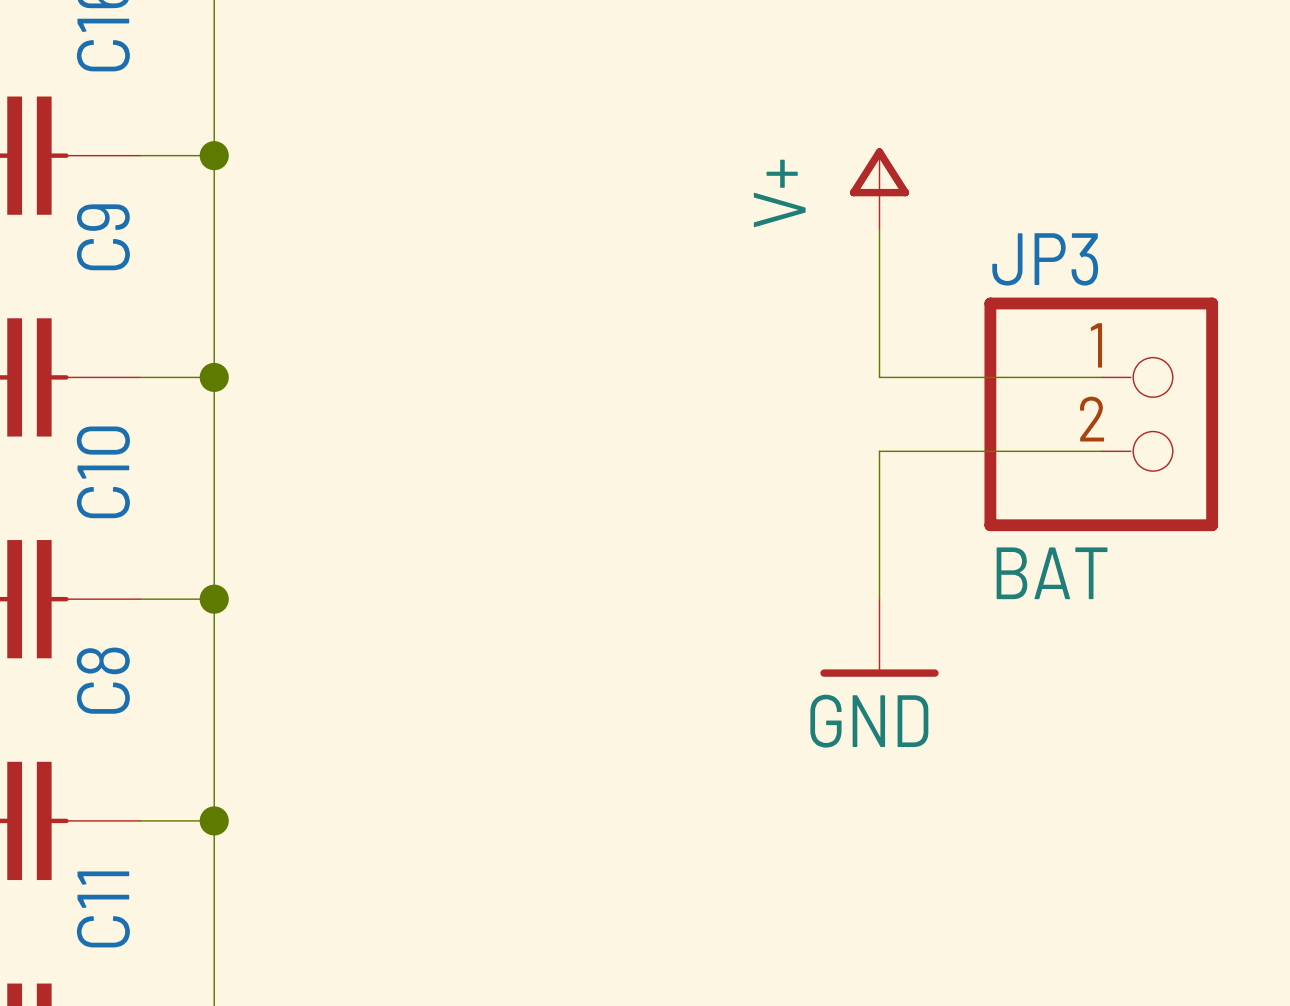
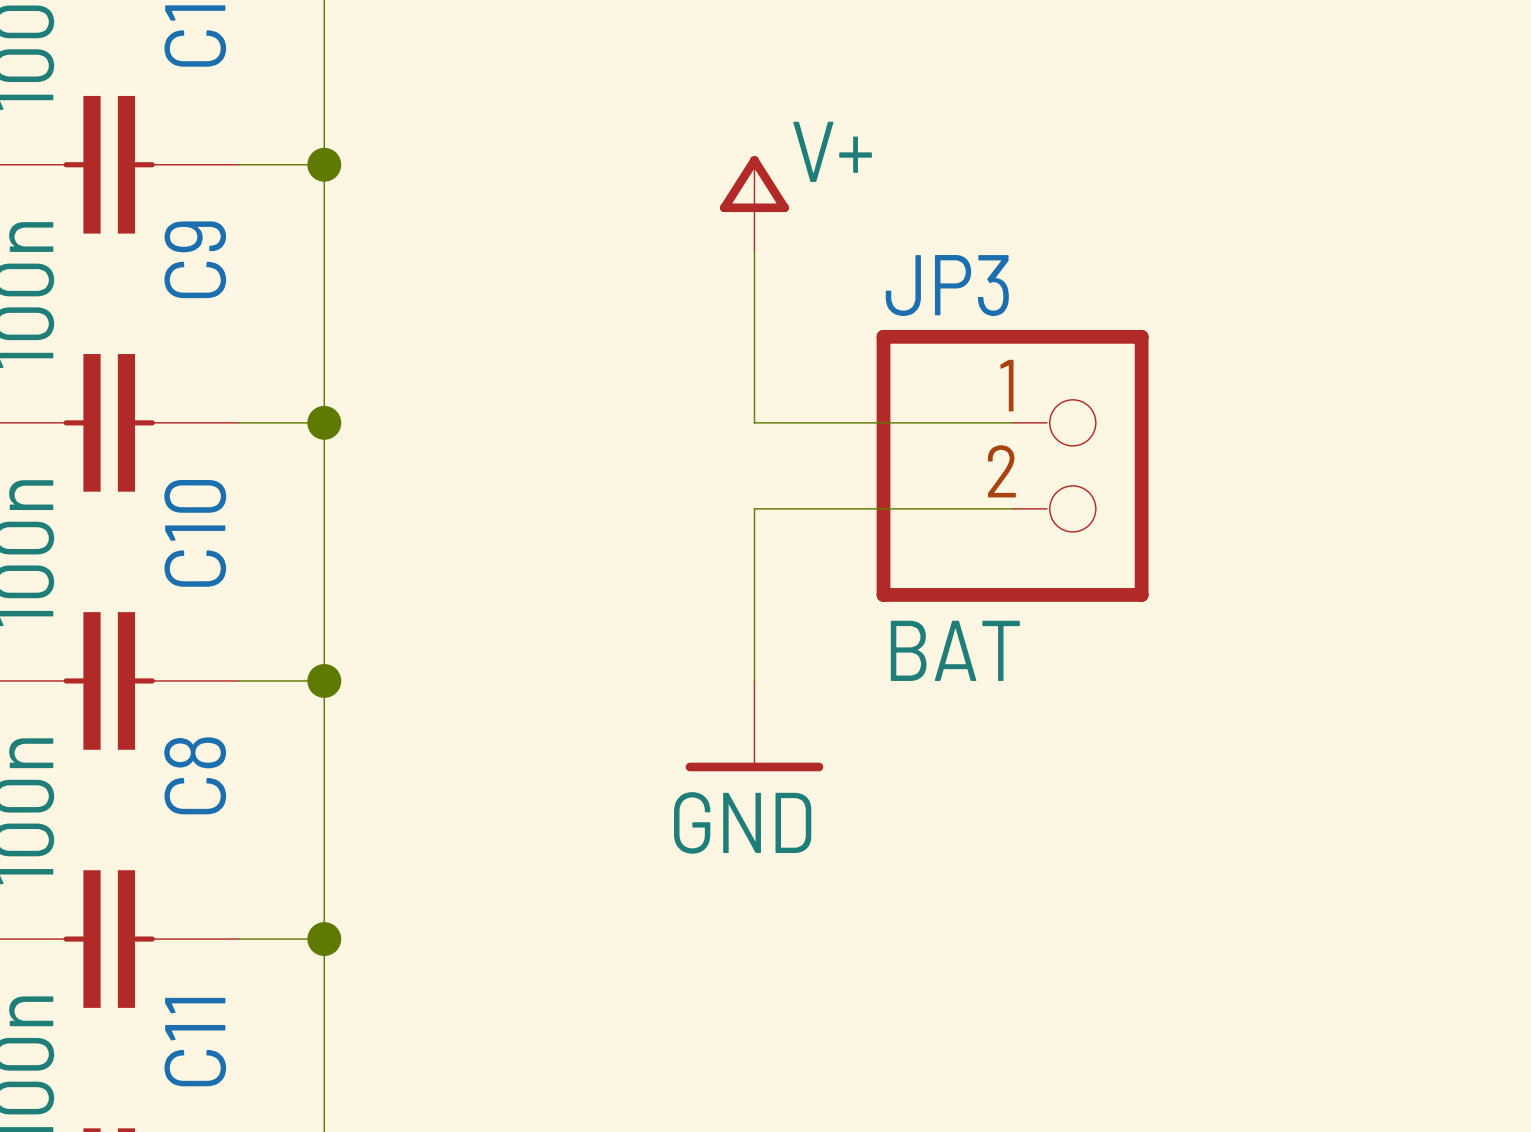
power symbol position: V+ (879, 188) -> V+ (754, 203)
power symbol text rotation: 0° (779, 193) -> 90° clockwise (832, 151)
power symbol text position: V+ (779, 193) -> V+ (832, 151)
wire: (879, 229) (879, 377) (1101, 377) -> (754, 250) (754, 422) (1012, 422)
JP3 position: (1101, 414) -> (1012, 465)
wire: (1101, 451) (879, 451) (879, 599) -> (1012, 508) (754, 508) (754, 680)
power symbol position: GND (879, 637) -> GND (754, 726)

